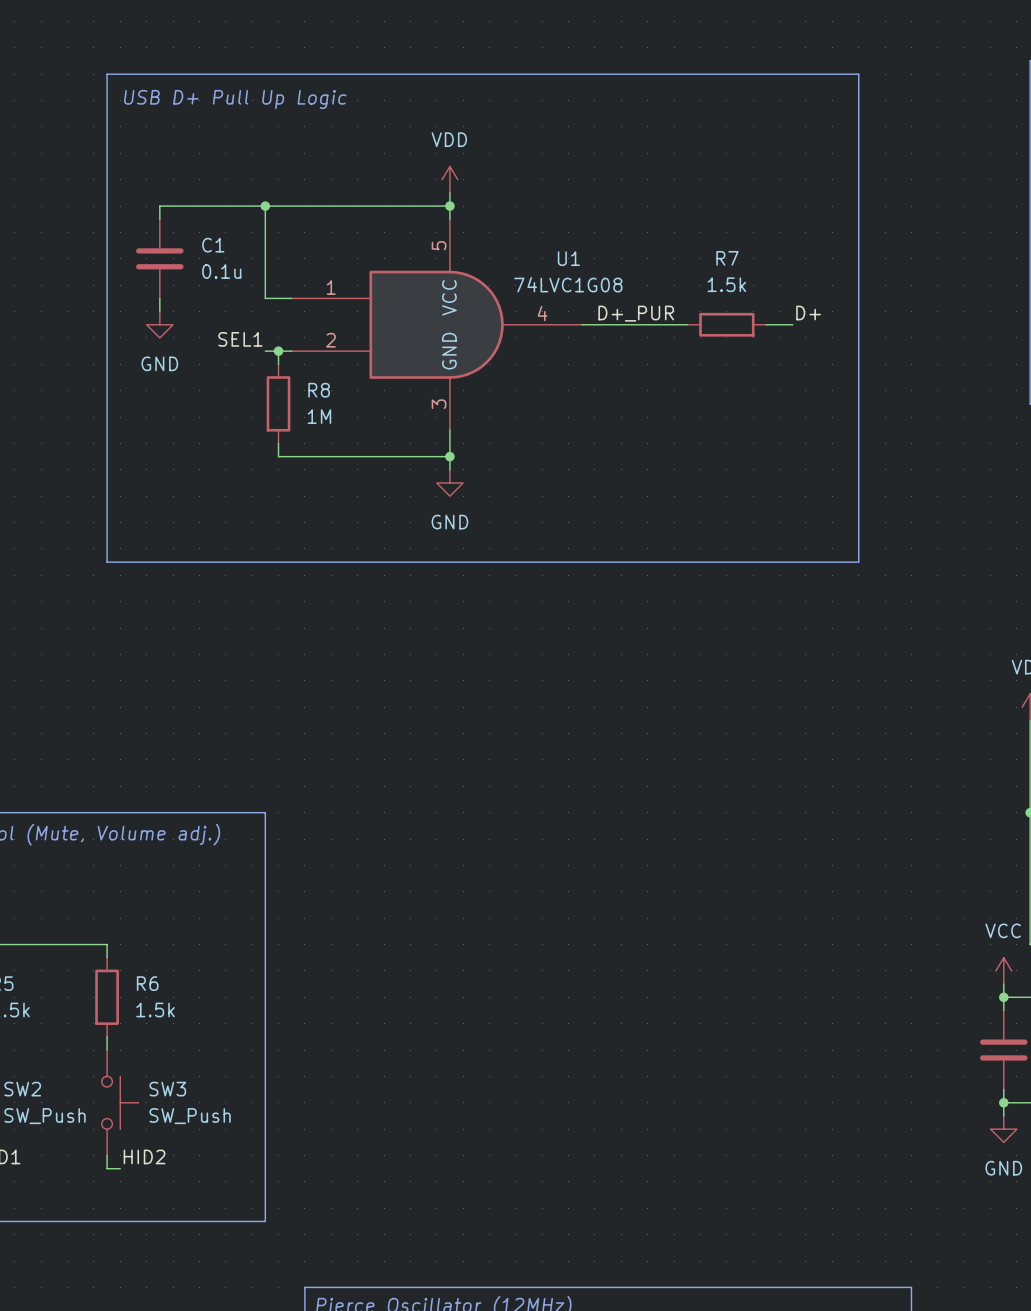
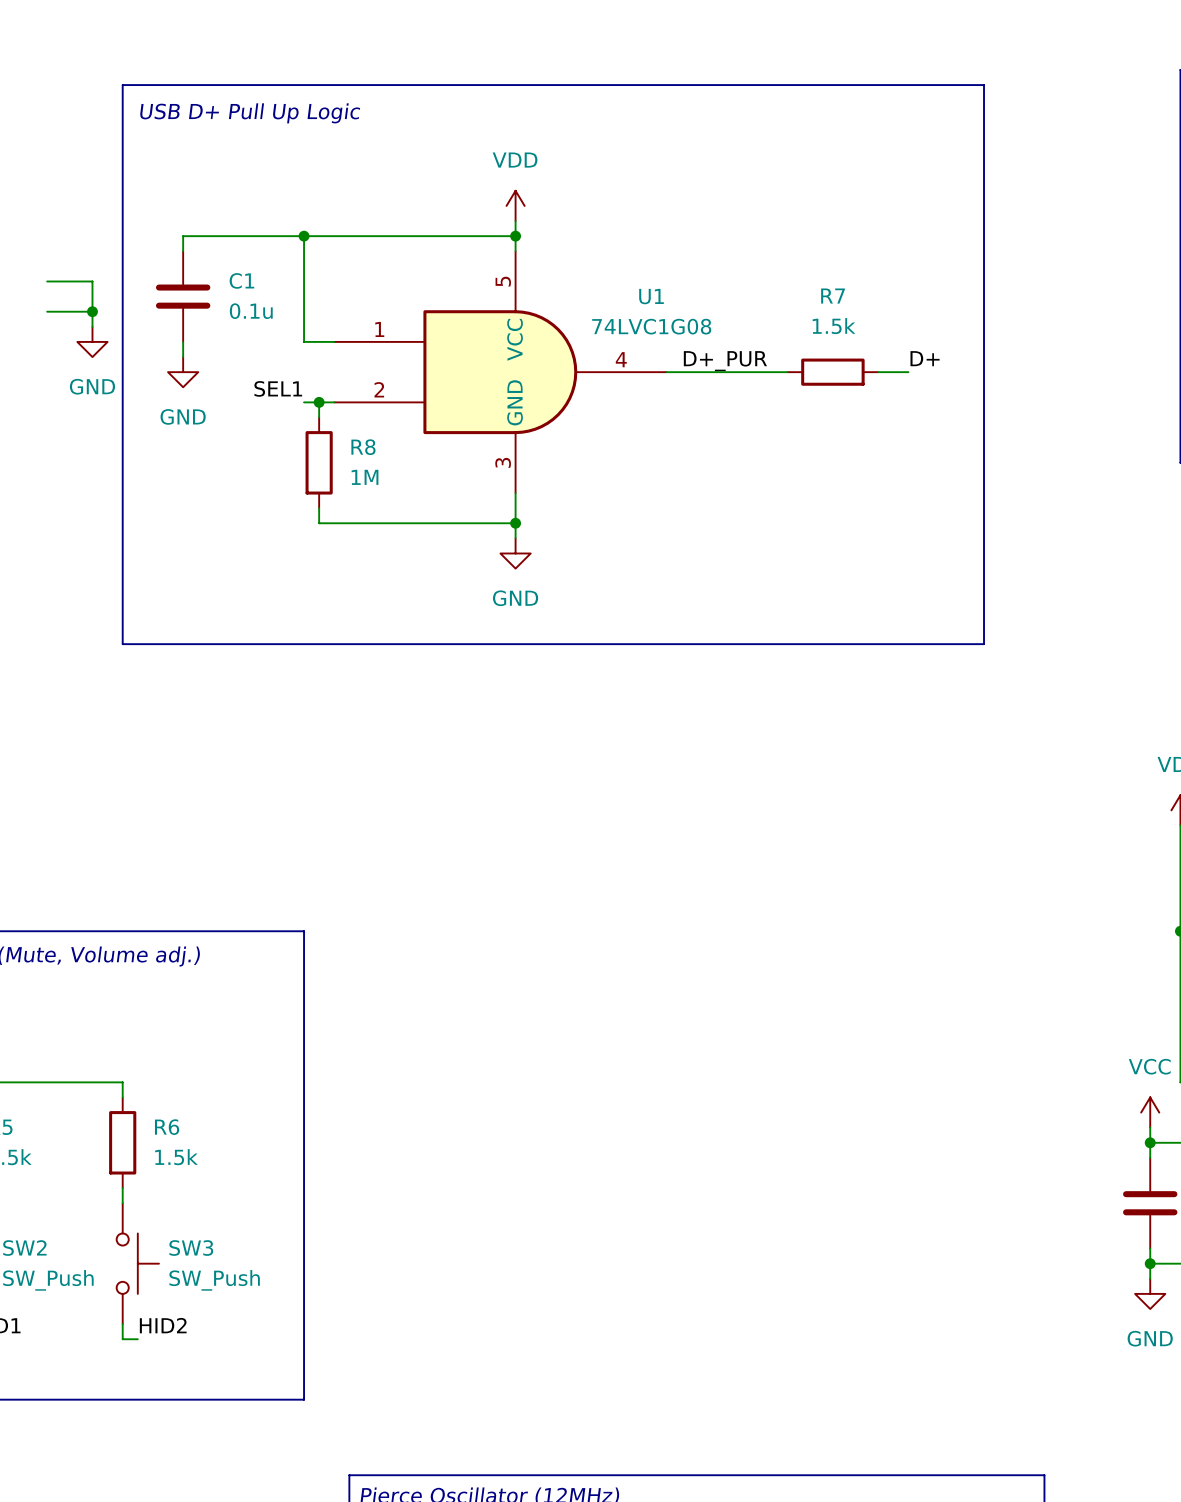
wire: none -> (47, 281) (92, 281) (92, 326)
wire: none -> (47, 311) (92, 311)
junction: none -> (92, 311)
power symbol: none -> GND (92, 341)

